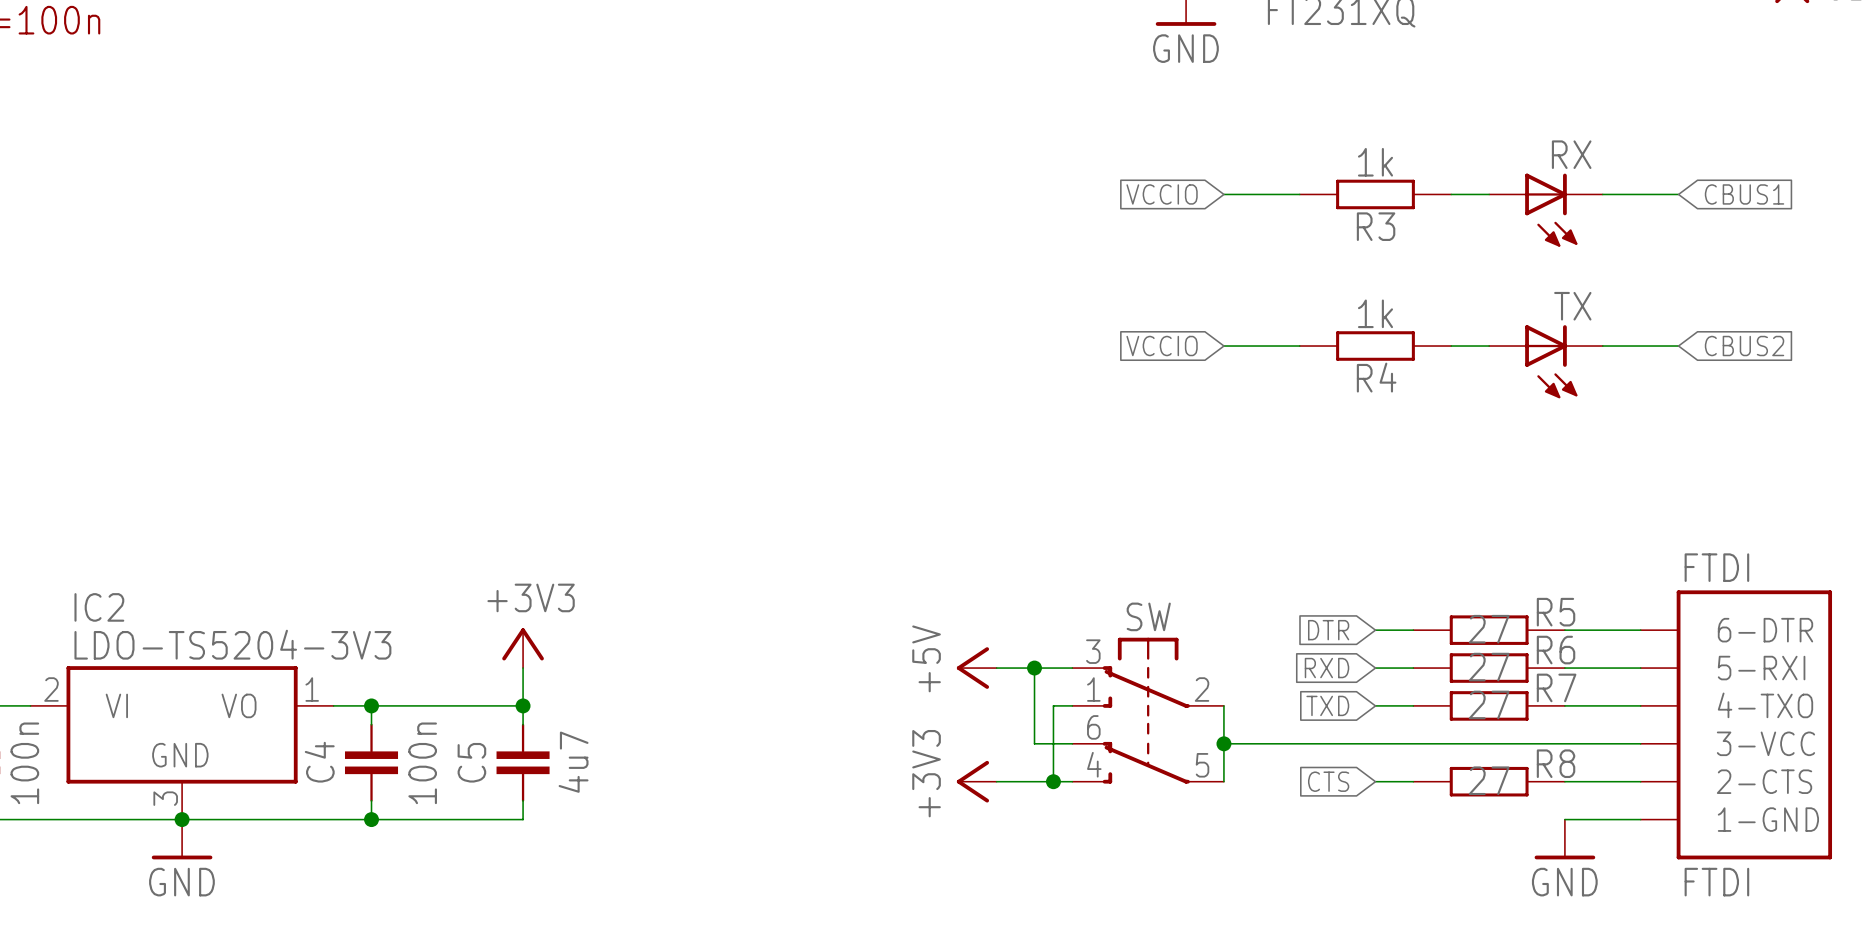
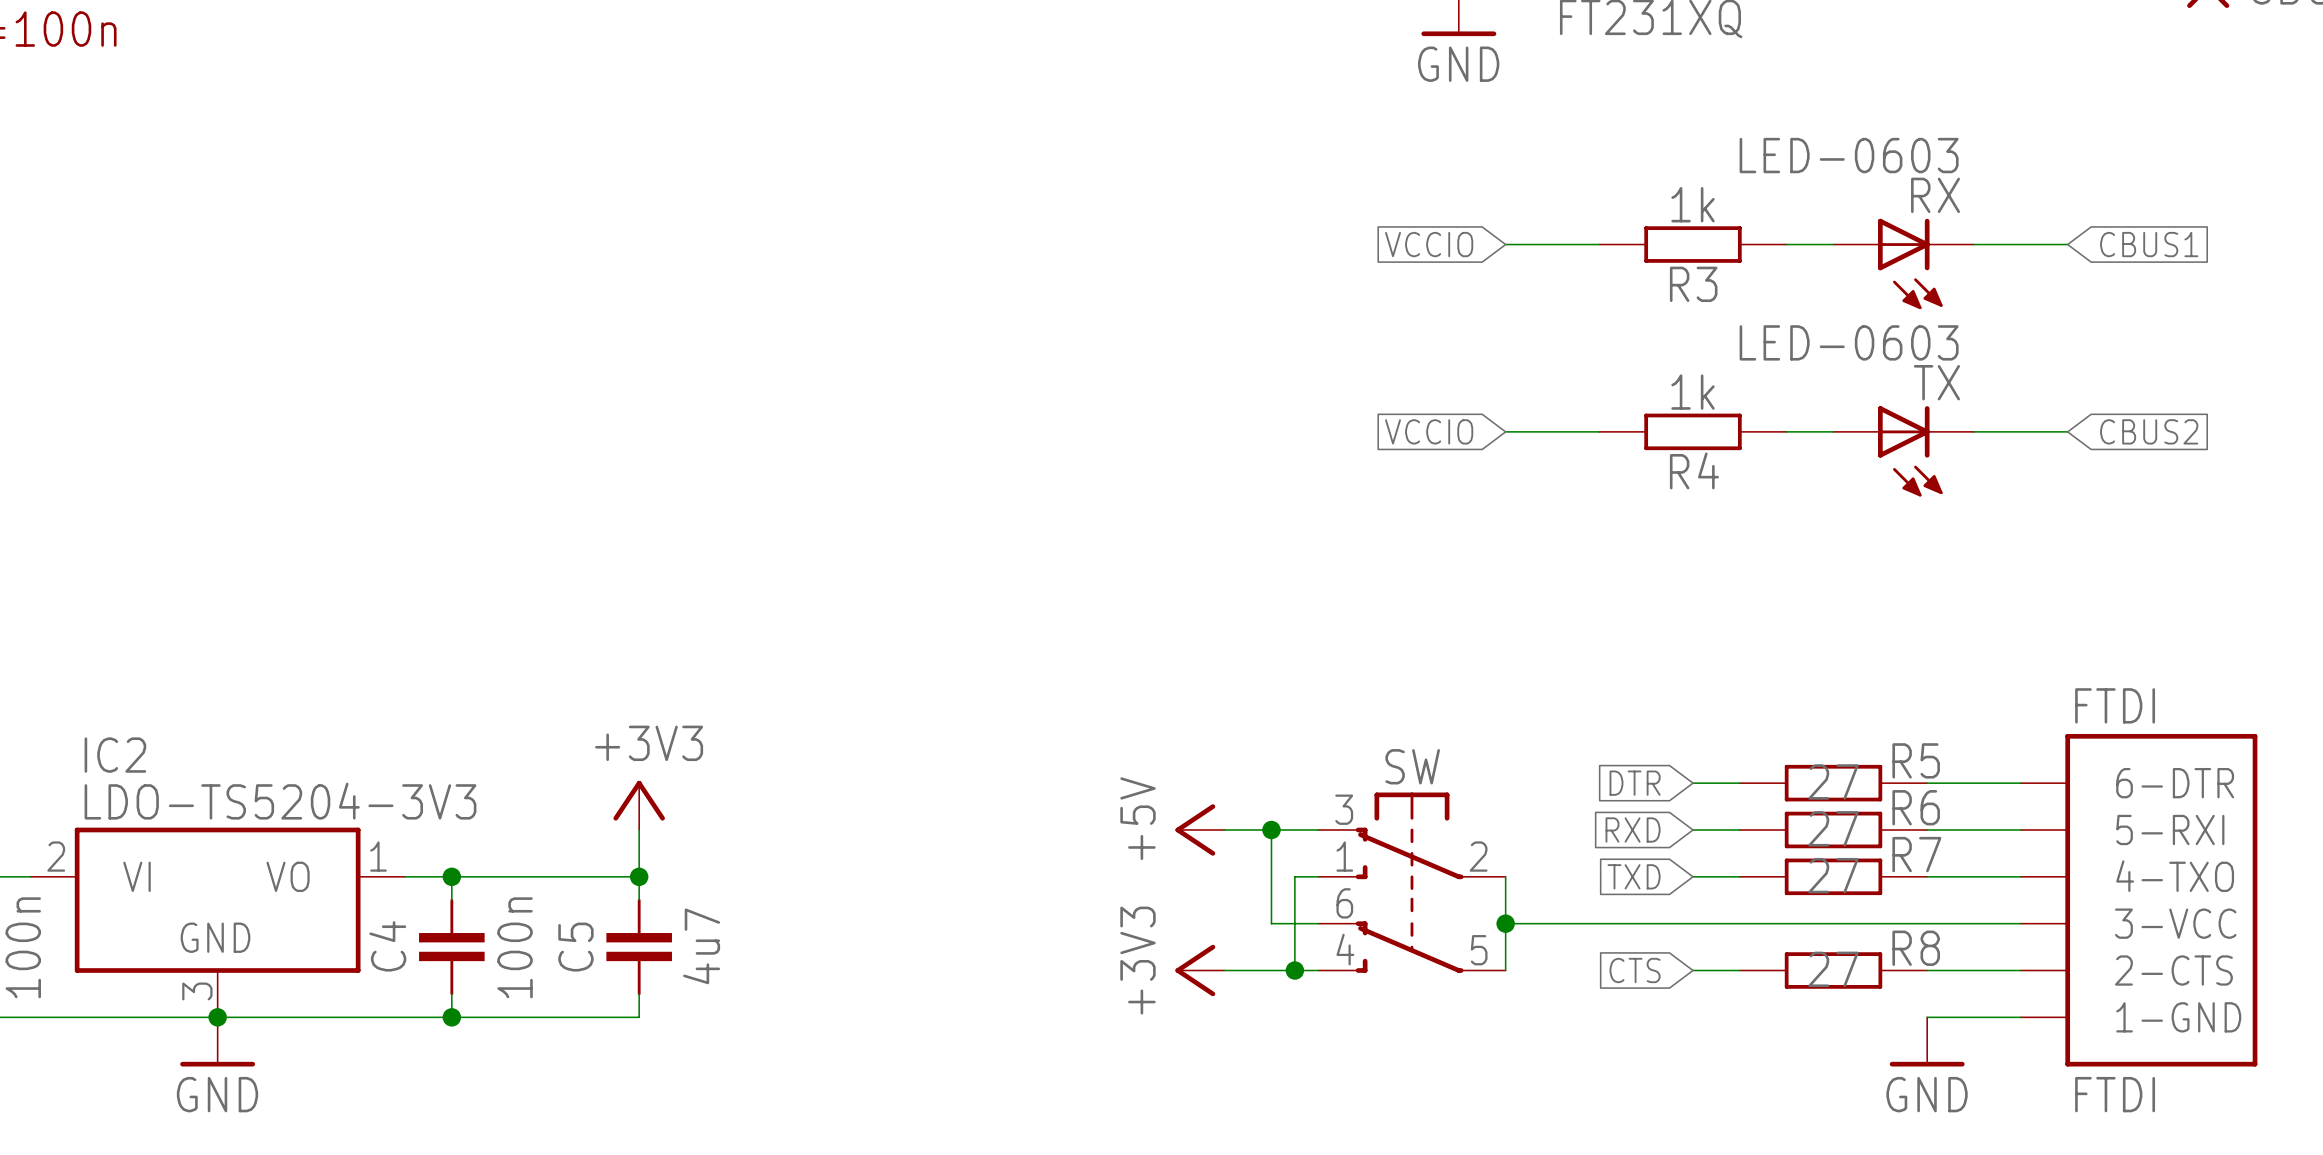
RX value: none -> LED-0603 (1849, 155)
TX value: none -> LED-0603 (1849, 342)

